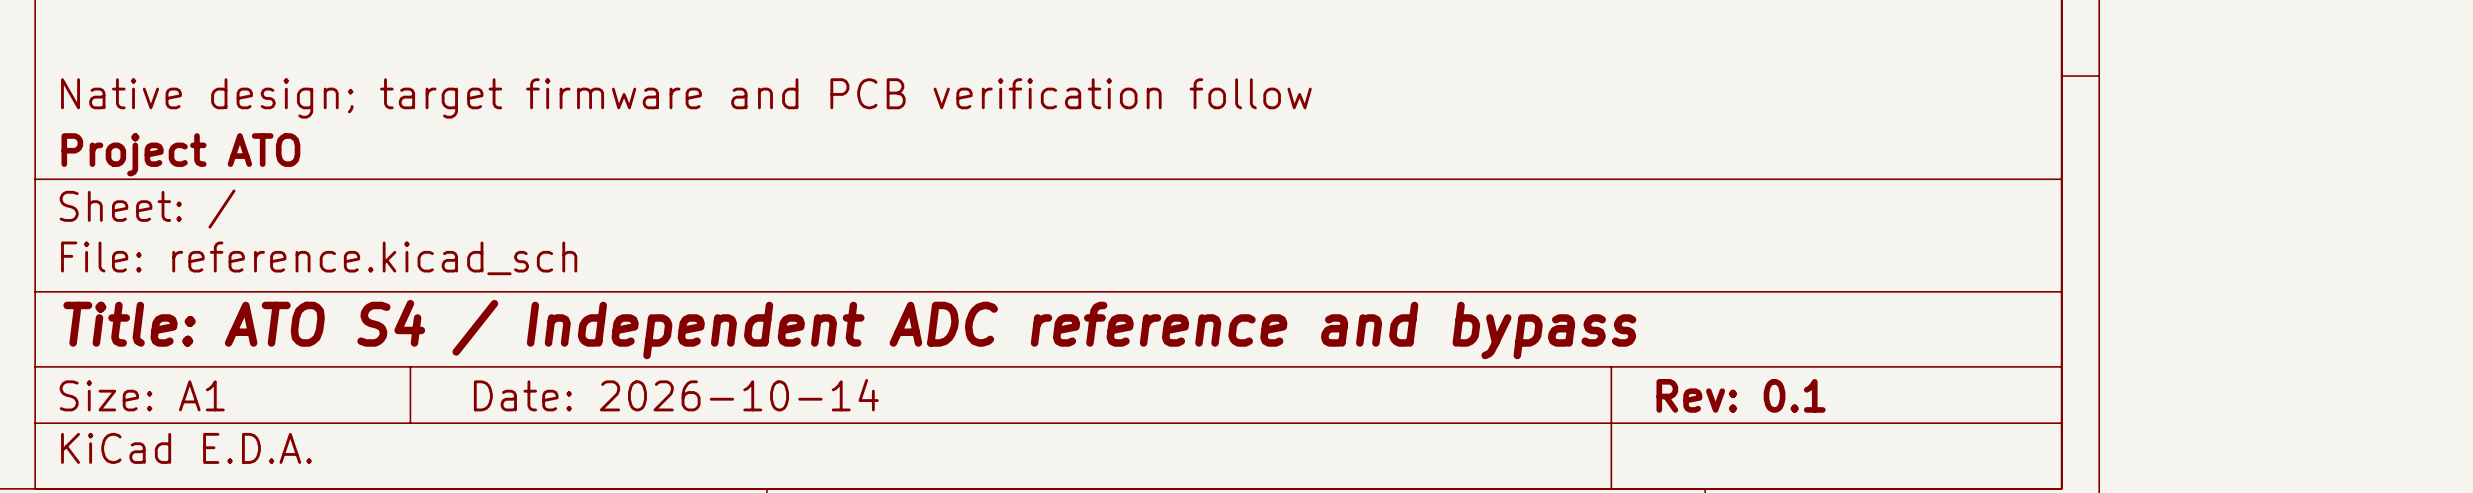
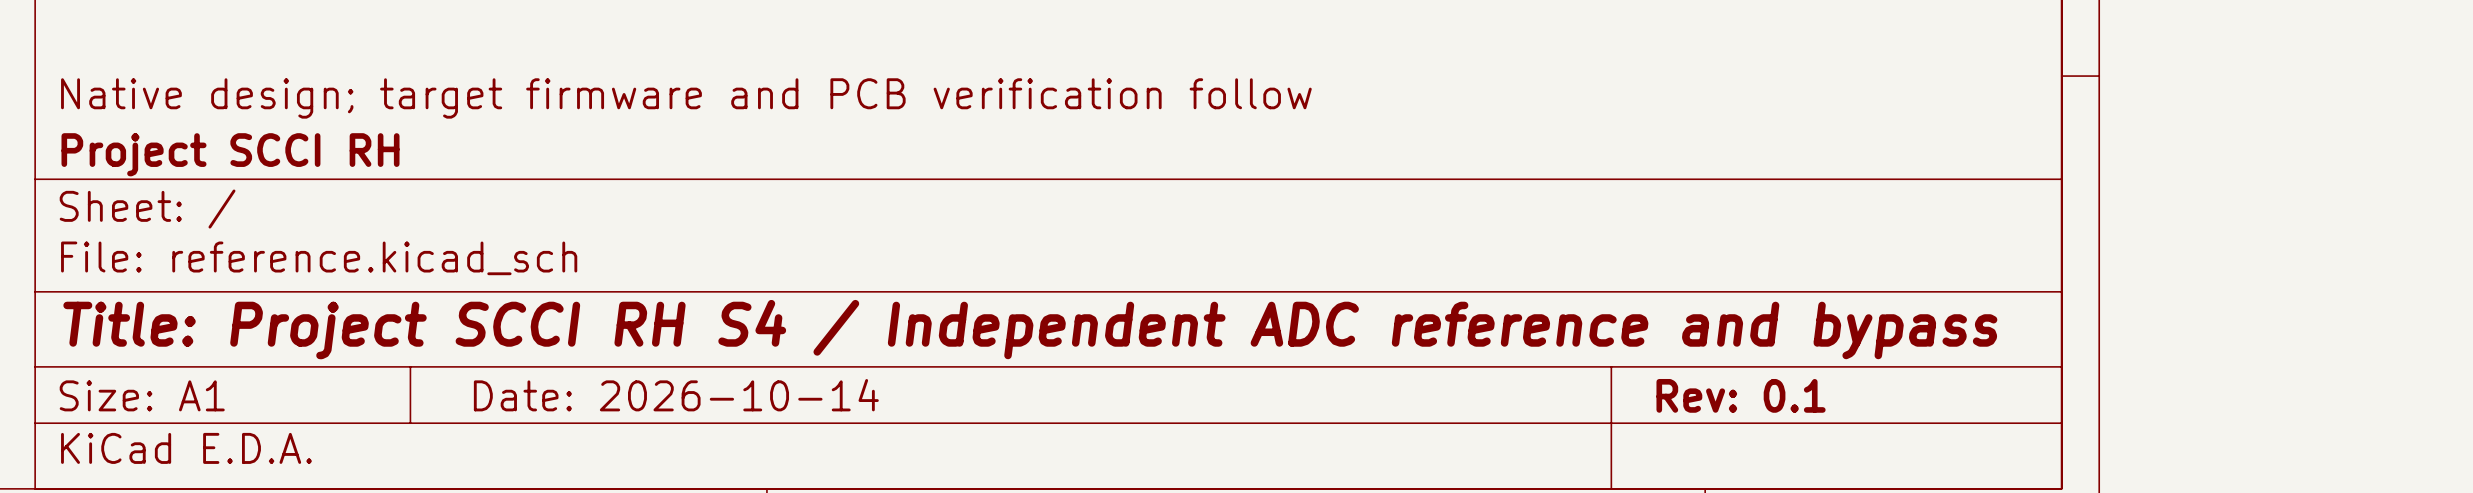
title block: Project ATO (180, 154) -> Project SCCI RH (230, 154)
title block: Title: ATO S4 / Independent ADC reference and bypass (849, 329) -> Title: Project SCCI RH S4 / Independent ADC reference and bypass (1030, 329)

